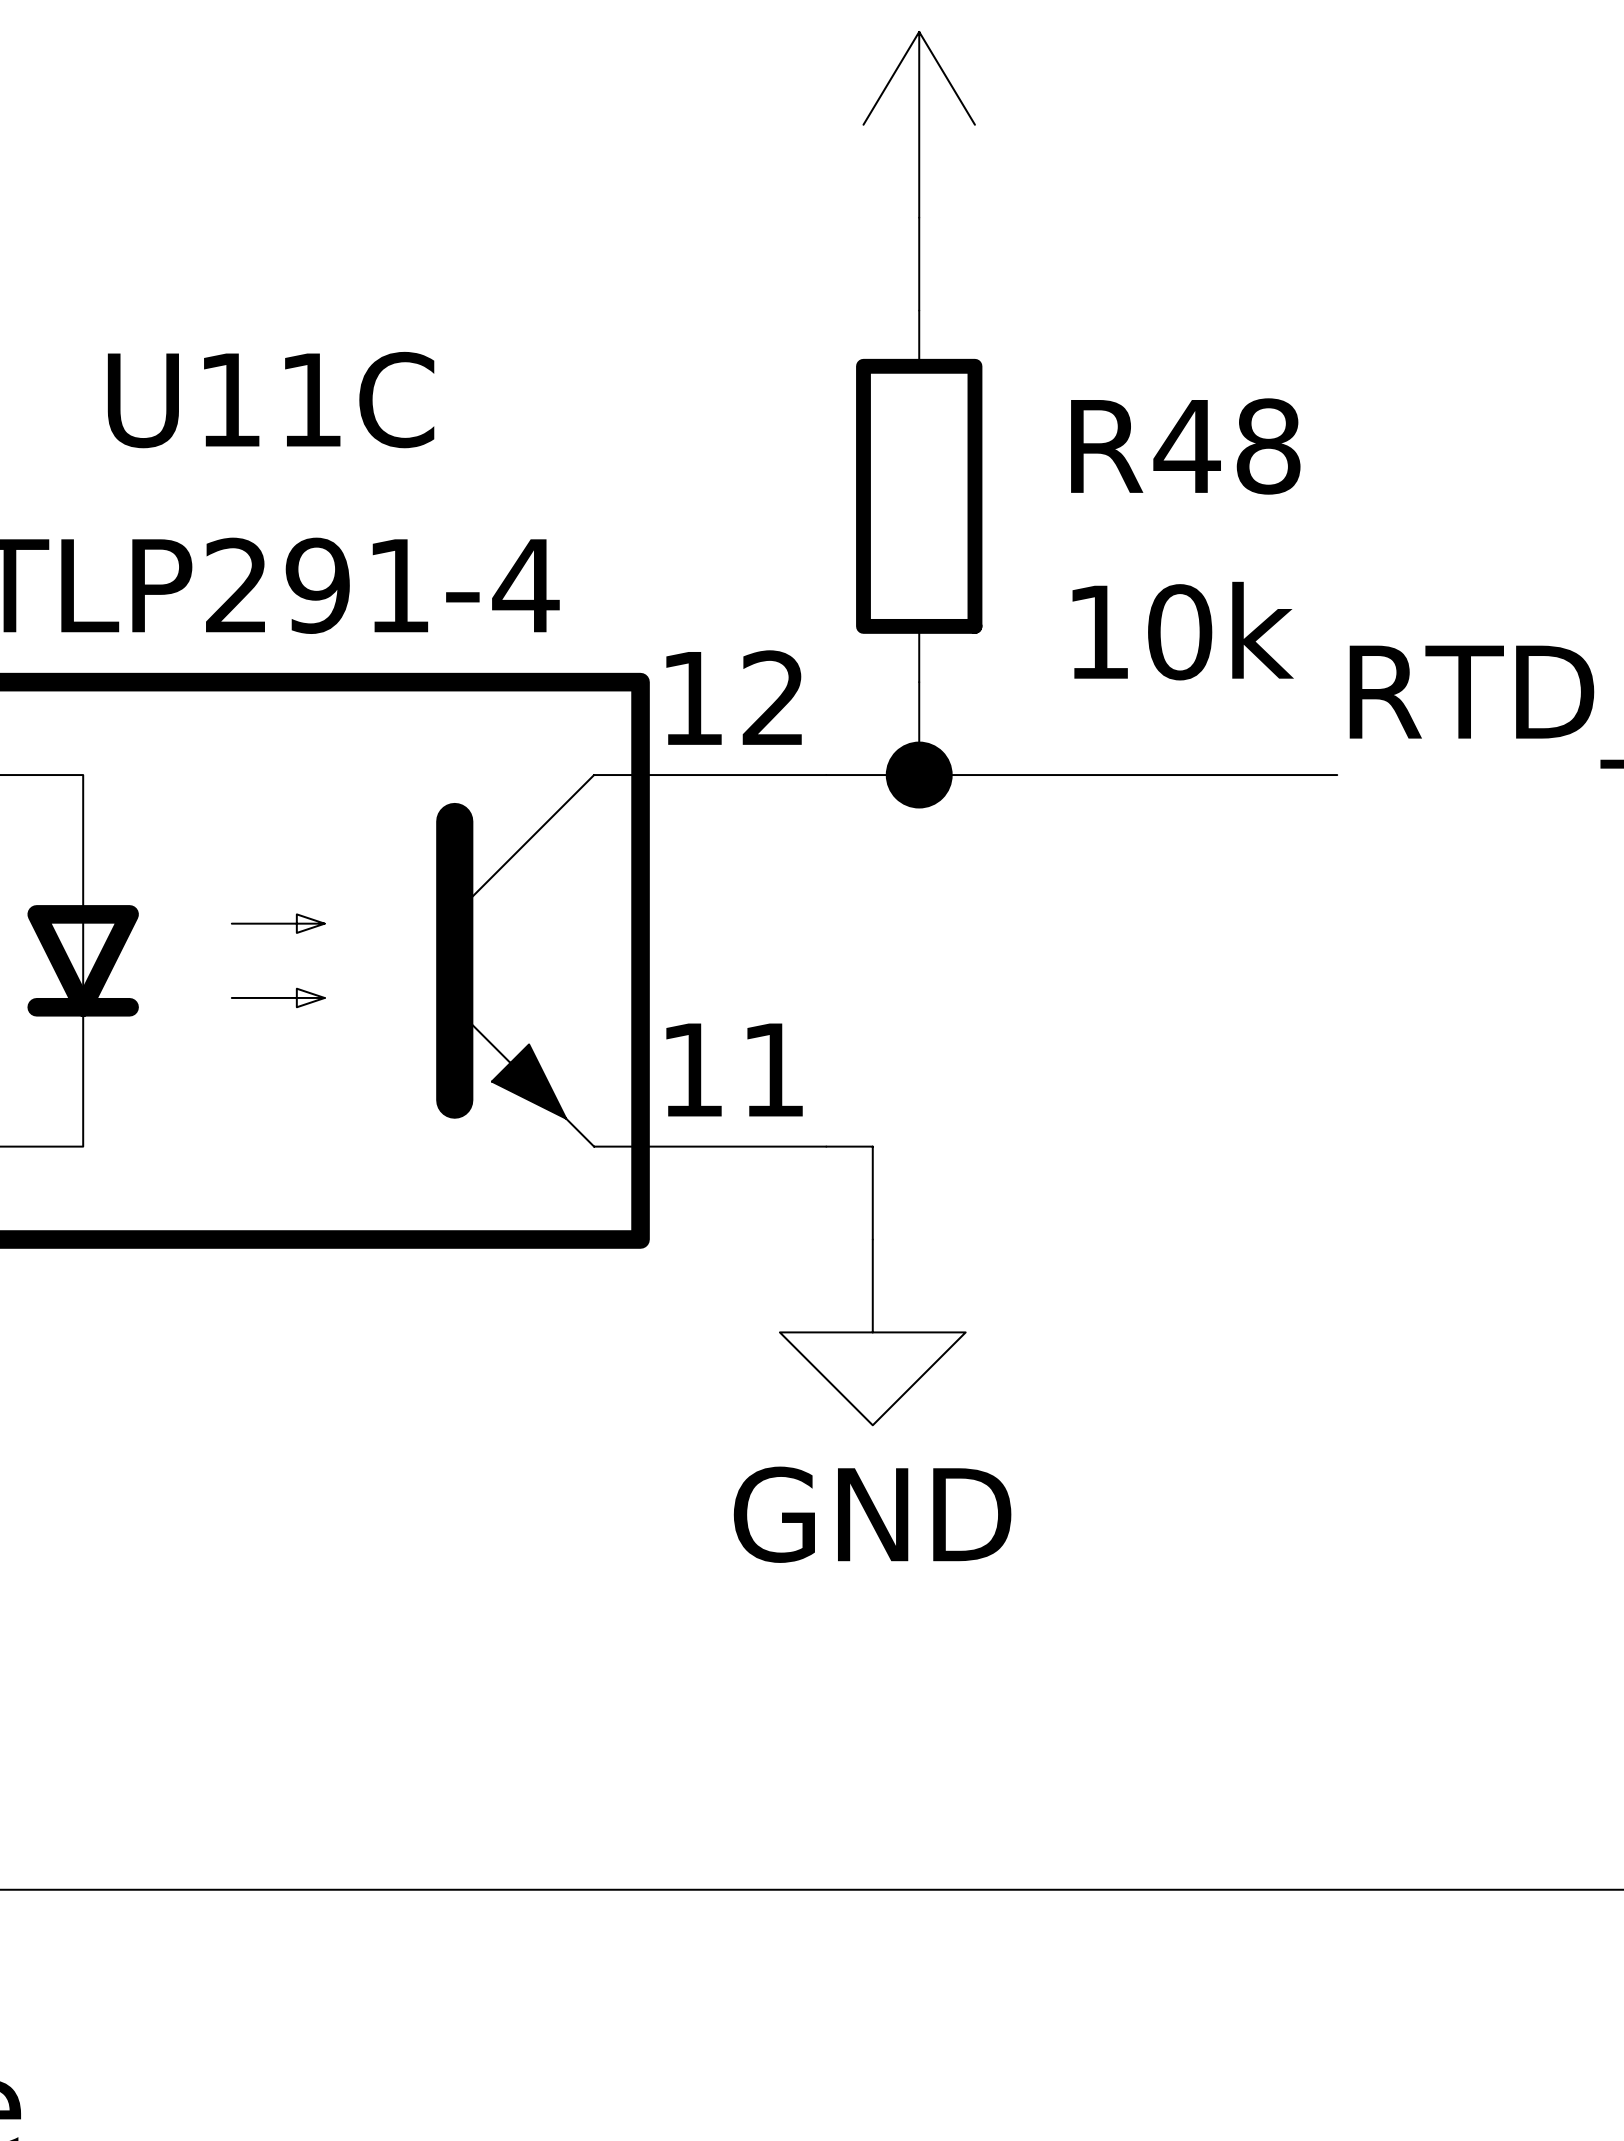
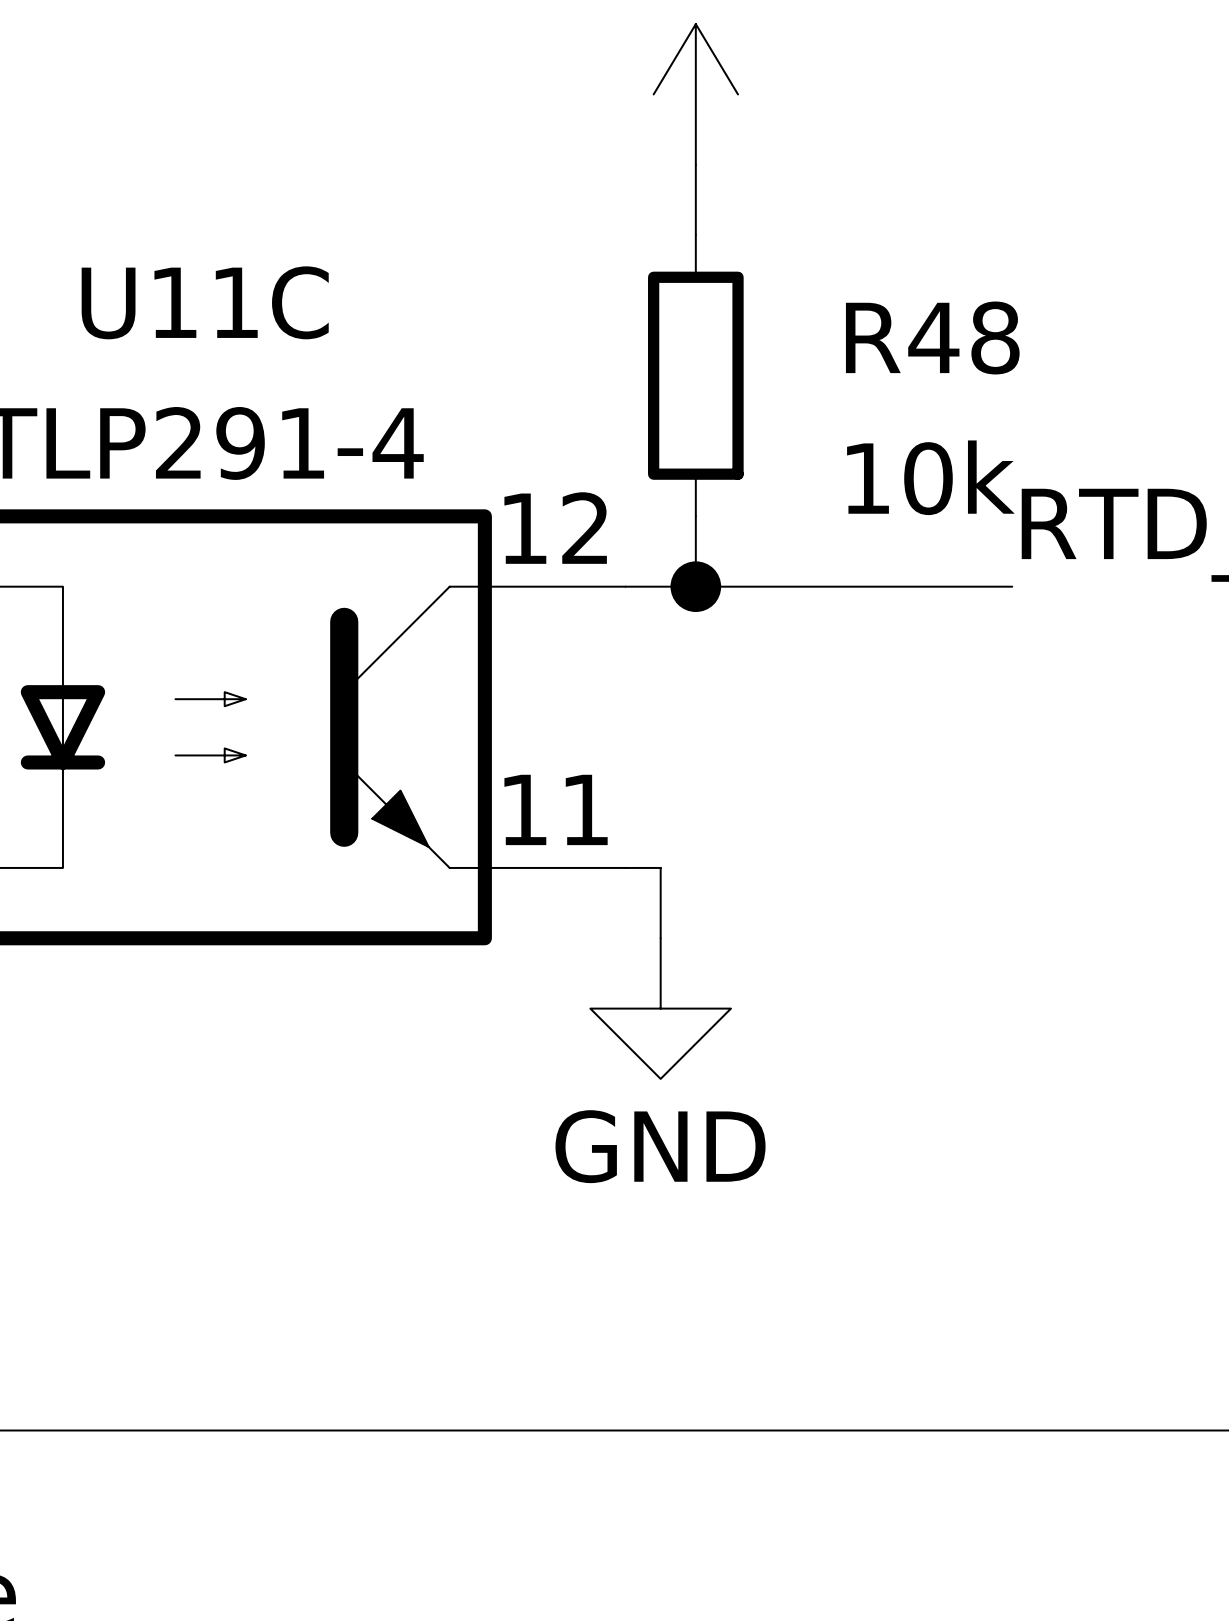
R48 name position: R48 (1185, 446) -> R48 (932, 337)
R48 value position: 10k (1183, 631) -> 10k (930, 477)

